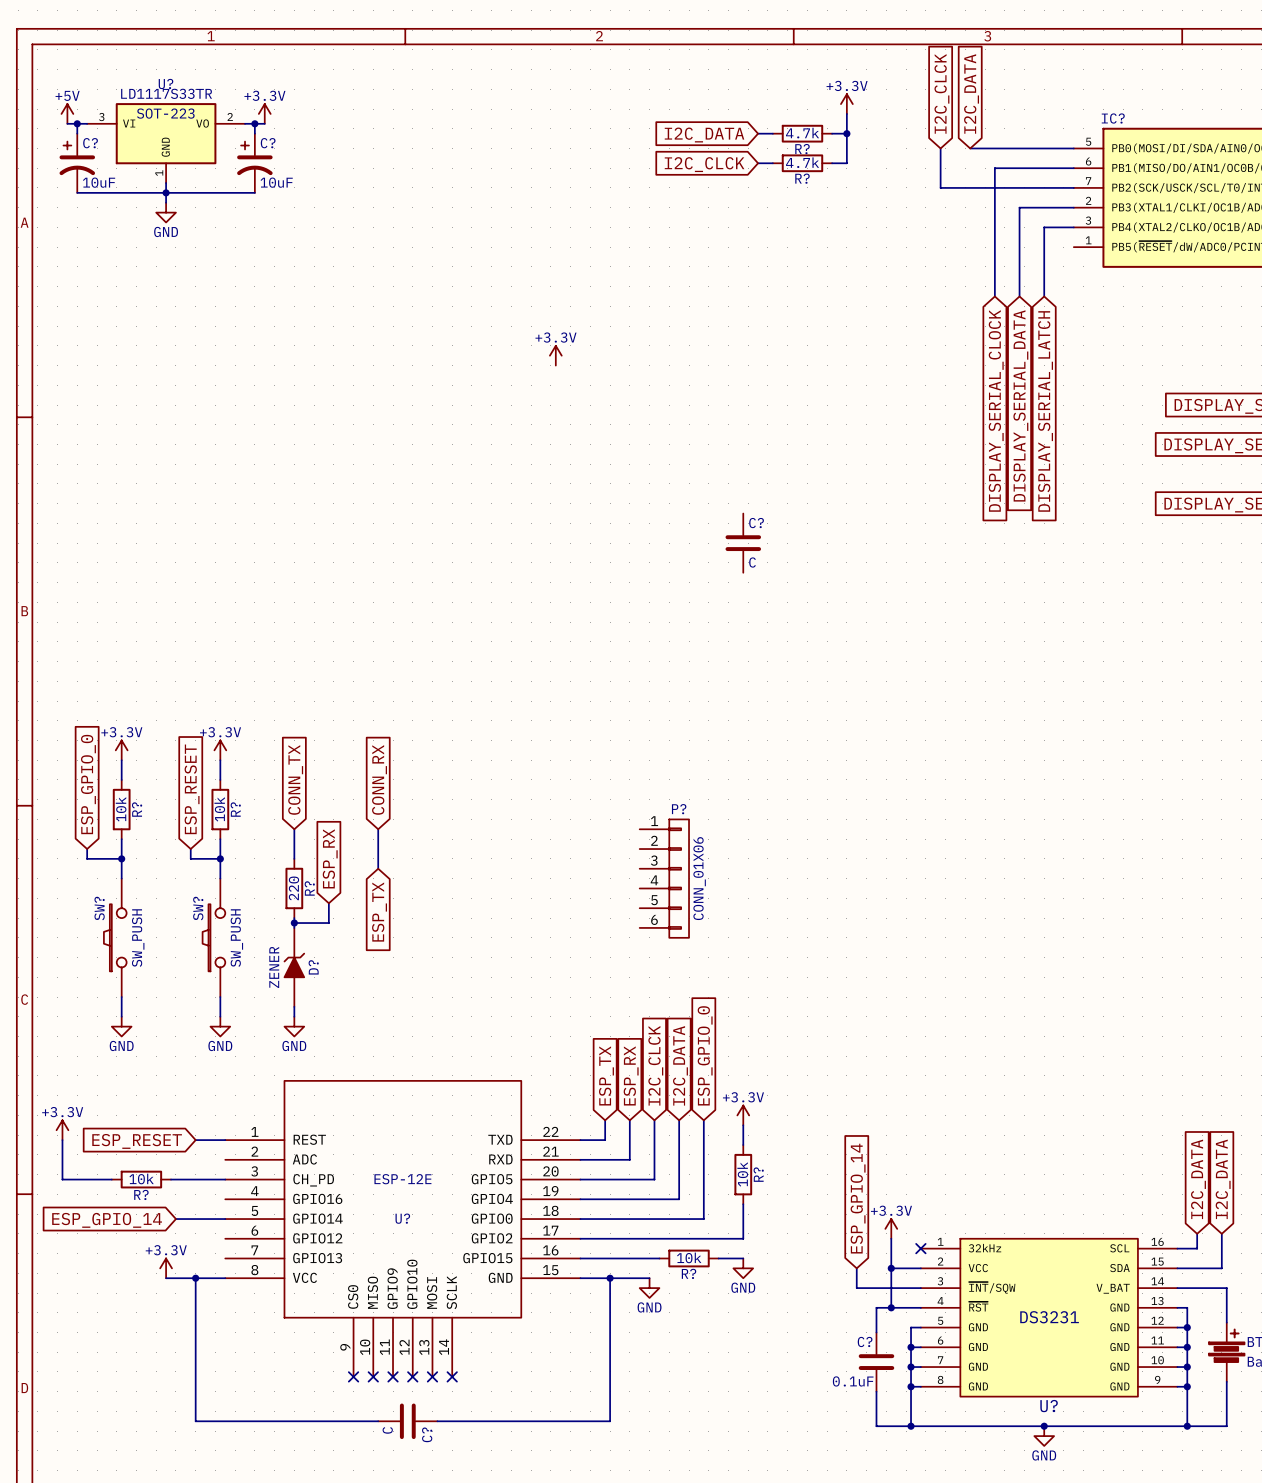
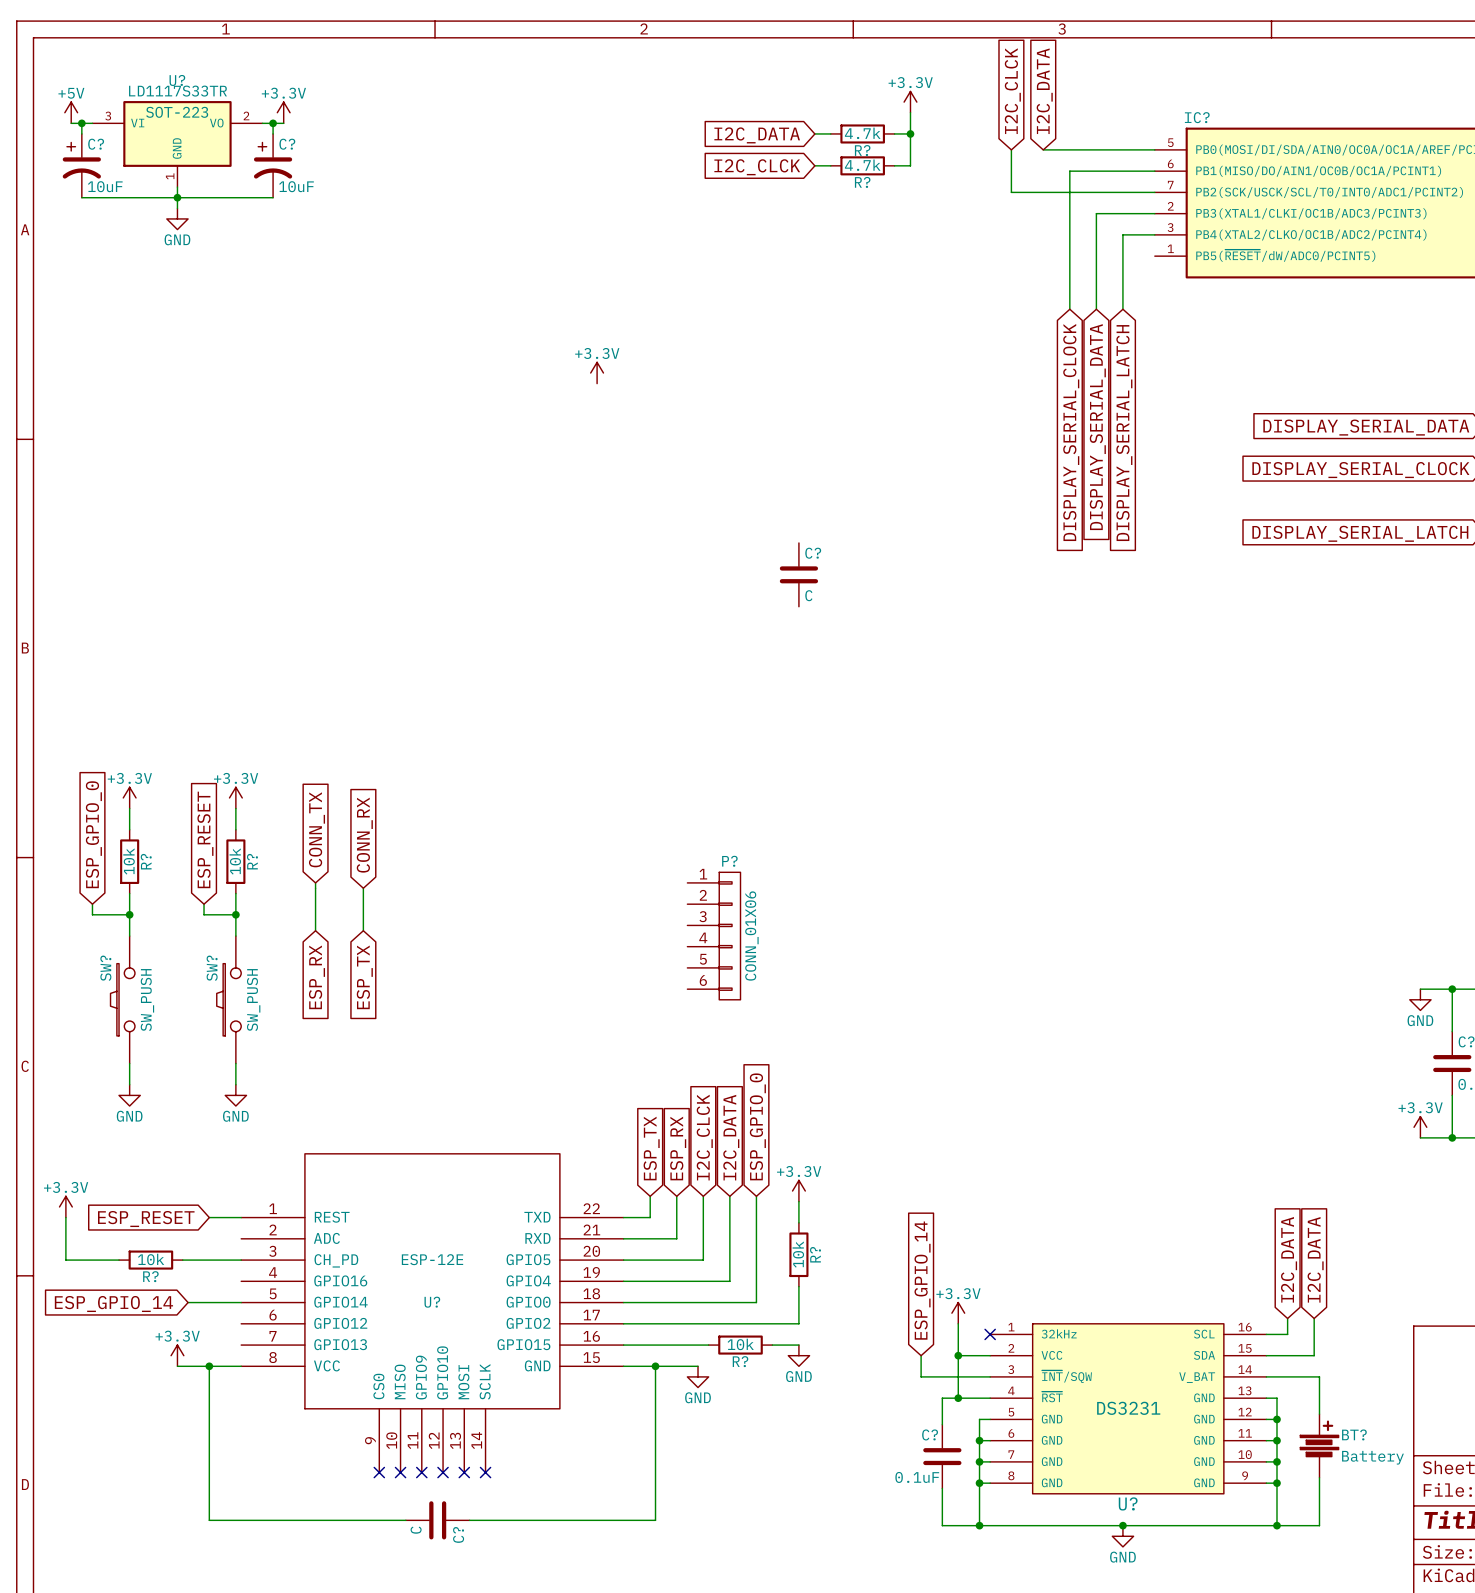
global label position: CONN_RX (379, 779) -> CONN_RX (364, 835)
wire: (378, 829) (378, 868) -> (363, 888) (363, 930)
global label rotation: 0° (330, 858) -> 180° (316, 977)
R?: 220 (294, 888) -> none
wire: (328, 903) (328, 923) (294, 923) -> none
global label position: ESP_TX (379, 912) -> ESP_TX (364, 977)
junction: (294, 923) -> none
D?: ZENER (294, 967) -> none
wire: (294, 1006) (294, 1016) -> none
power symbol: GND (294, 1026) -> none

